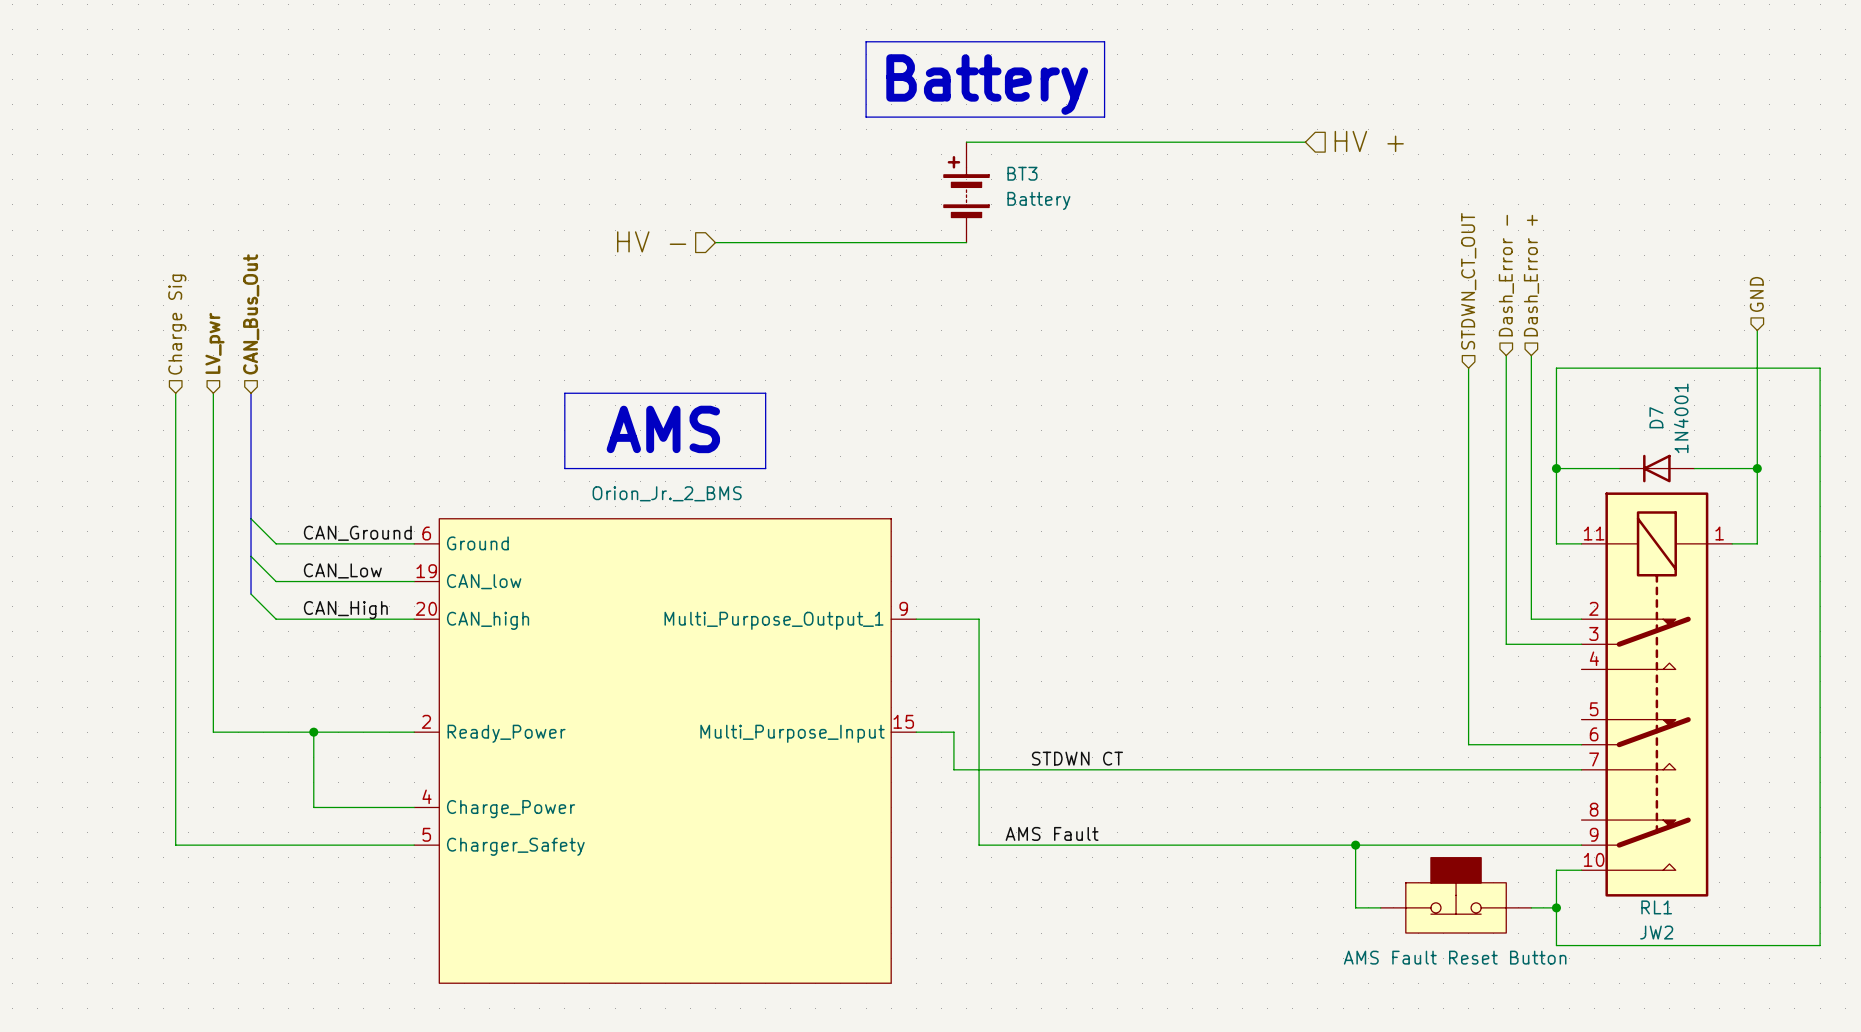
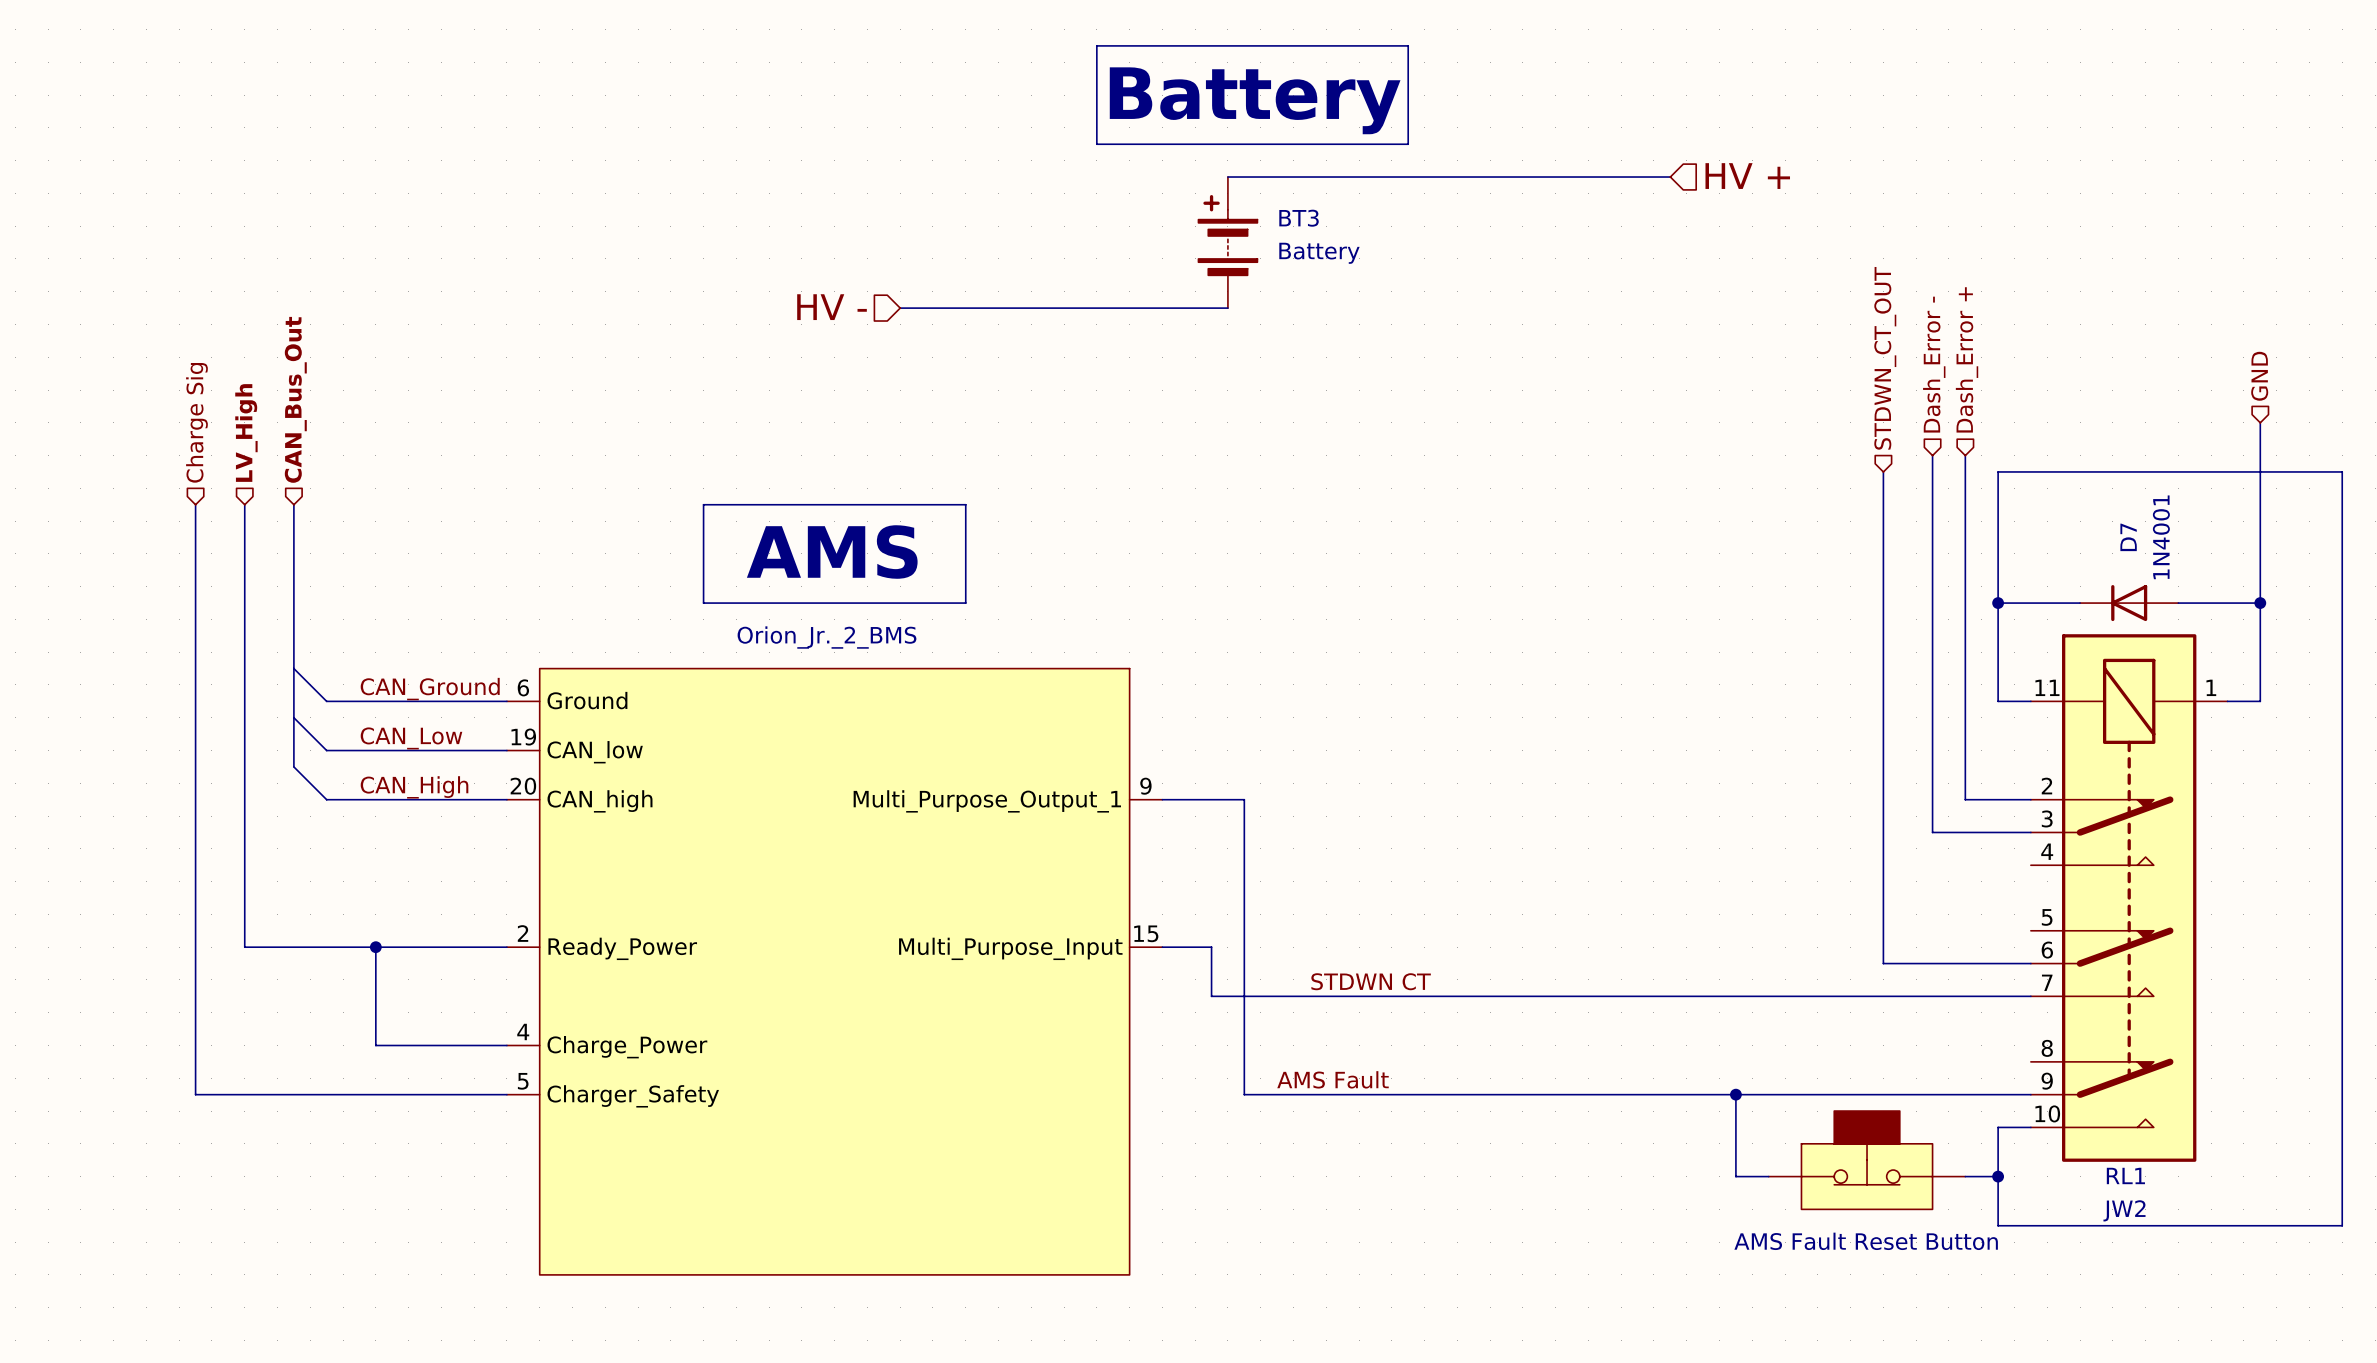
hierarchical label: LV_pwr (214, 343) -> LV_High (246, 433)

